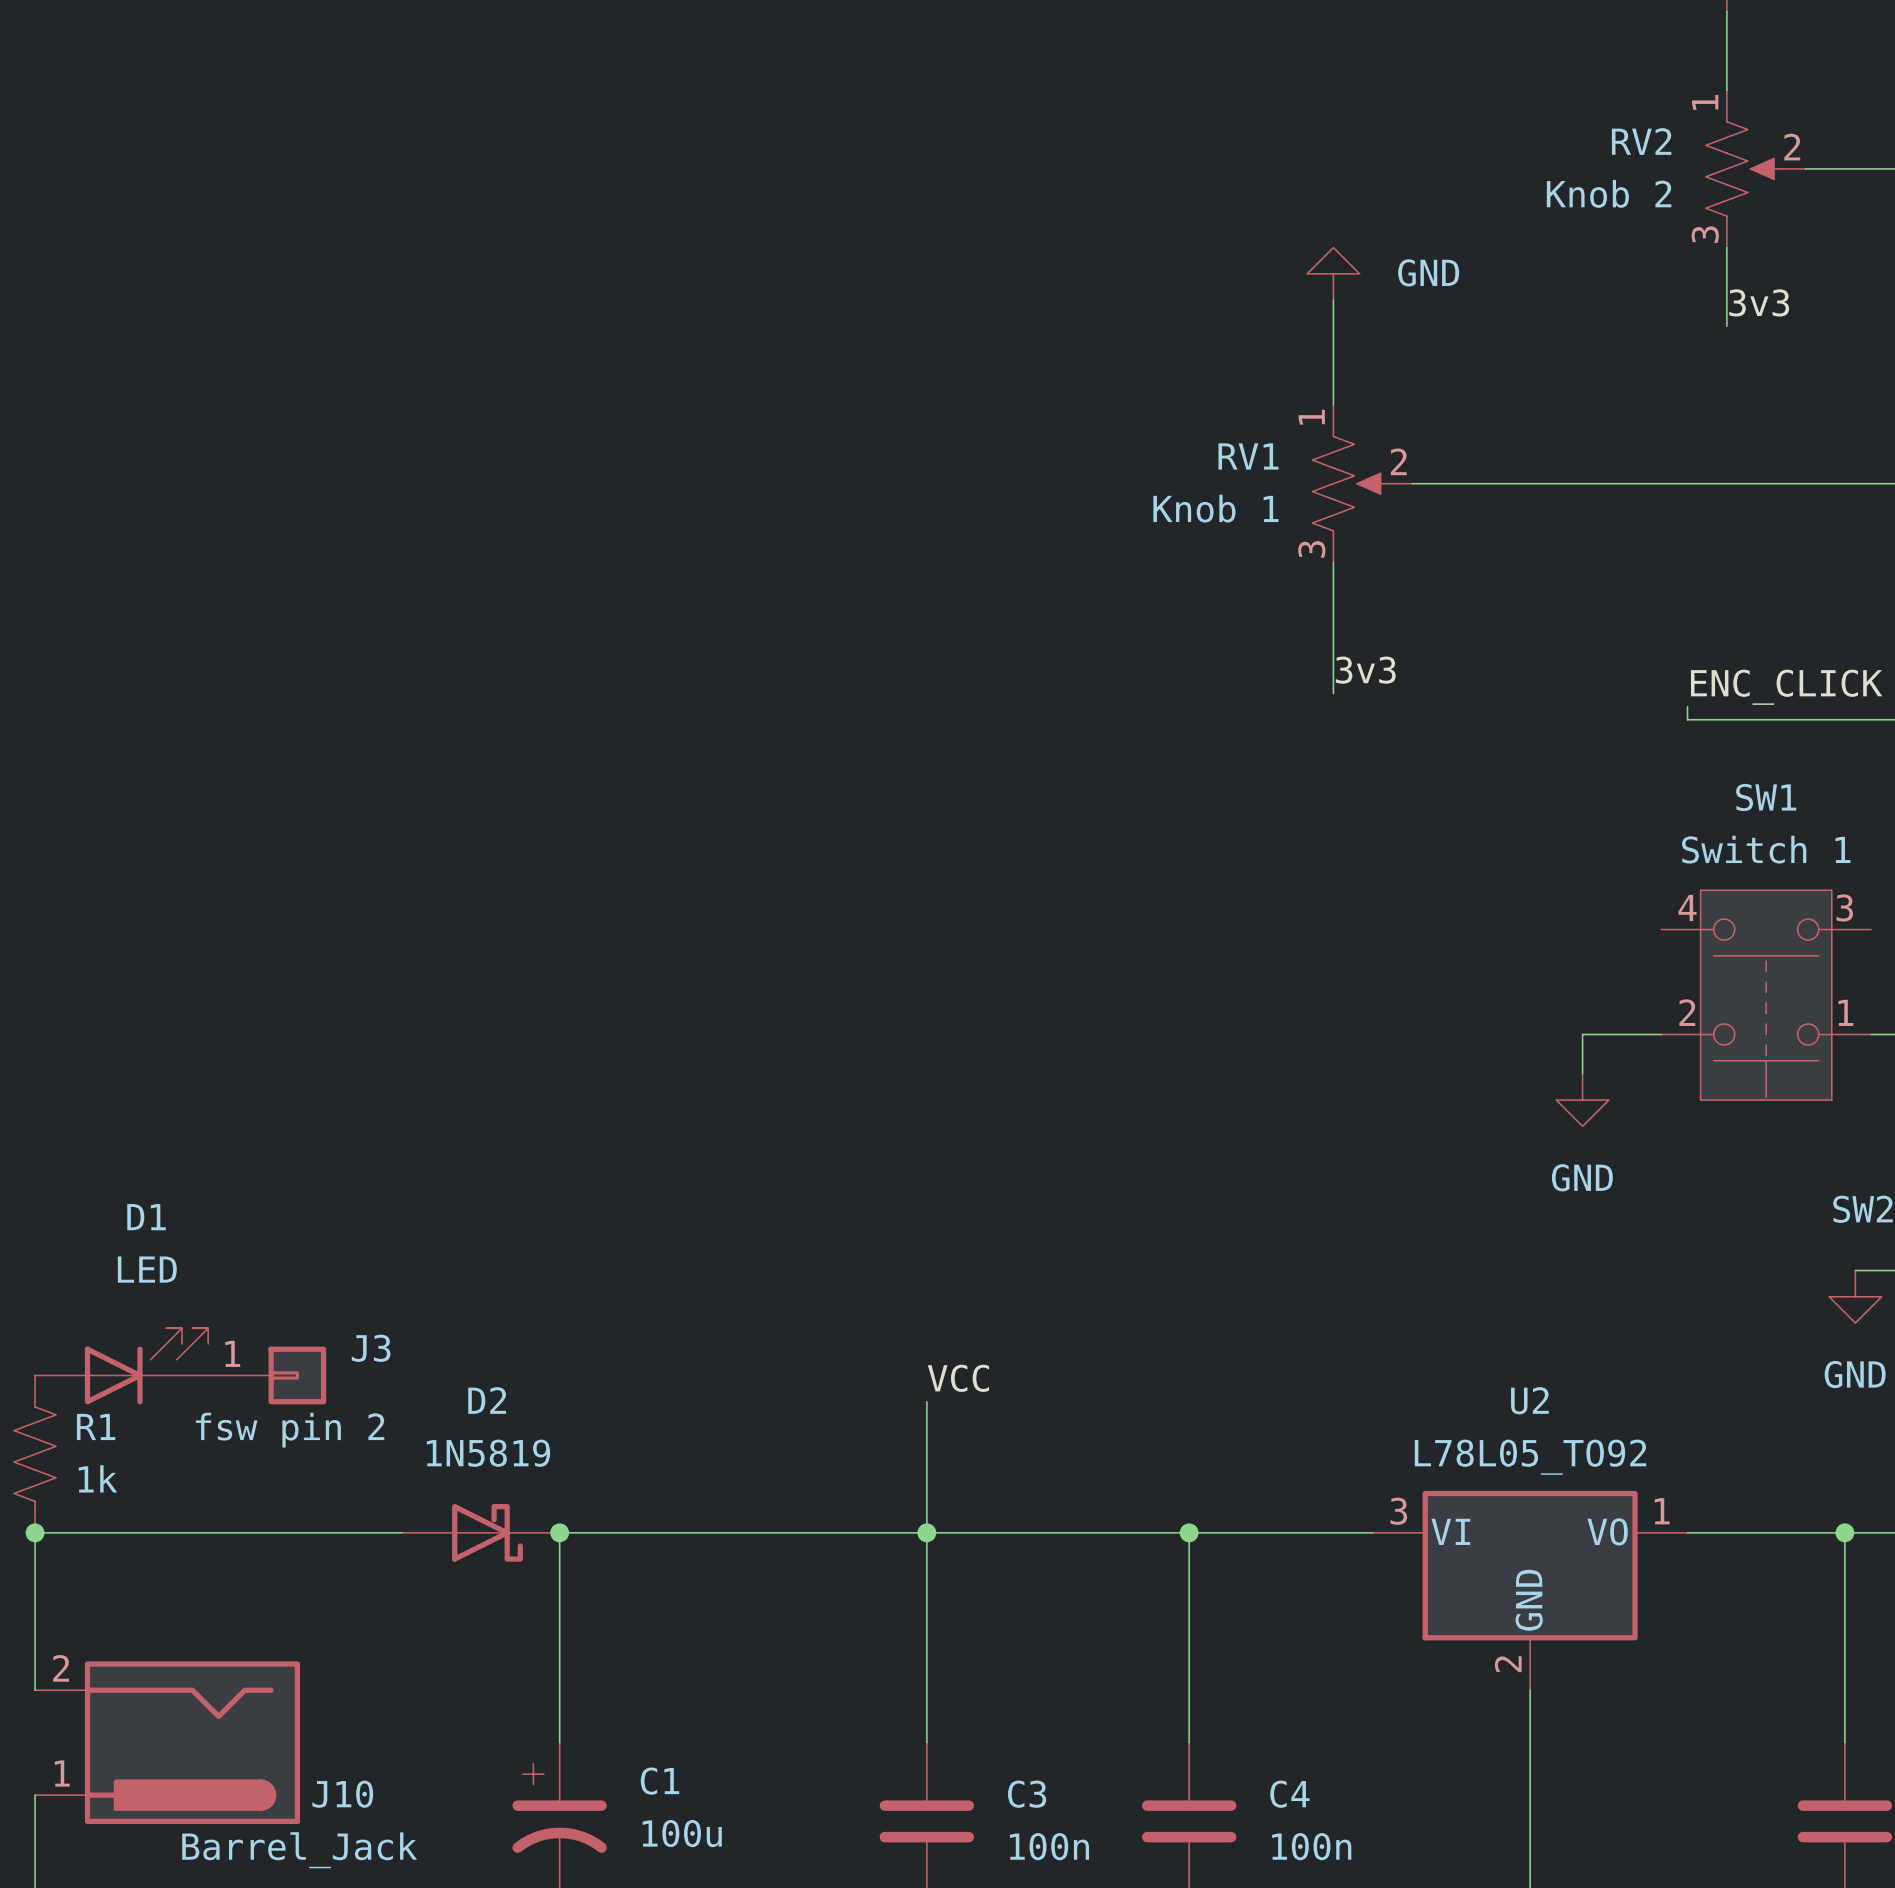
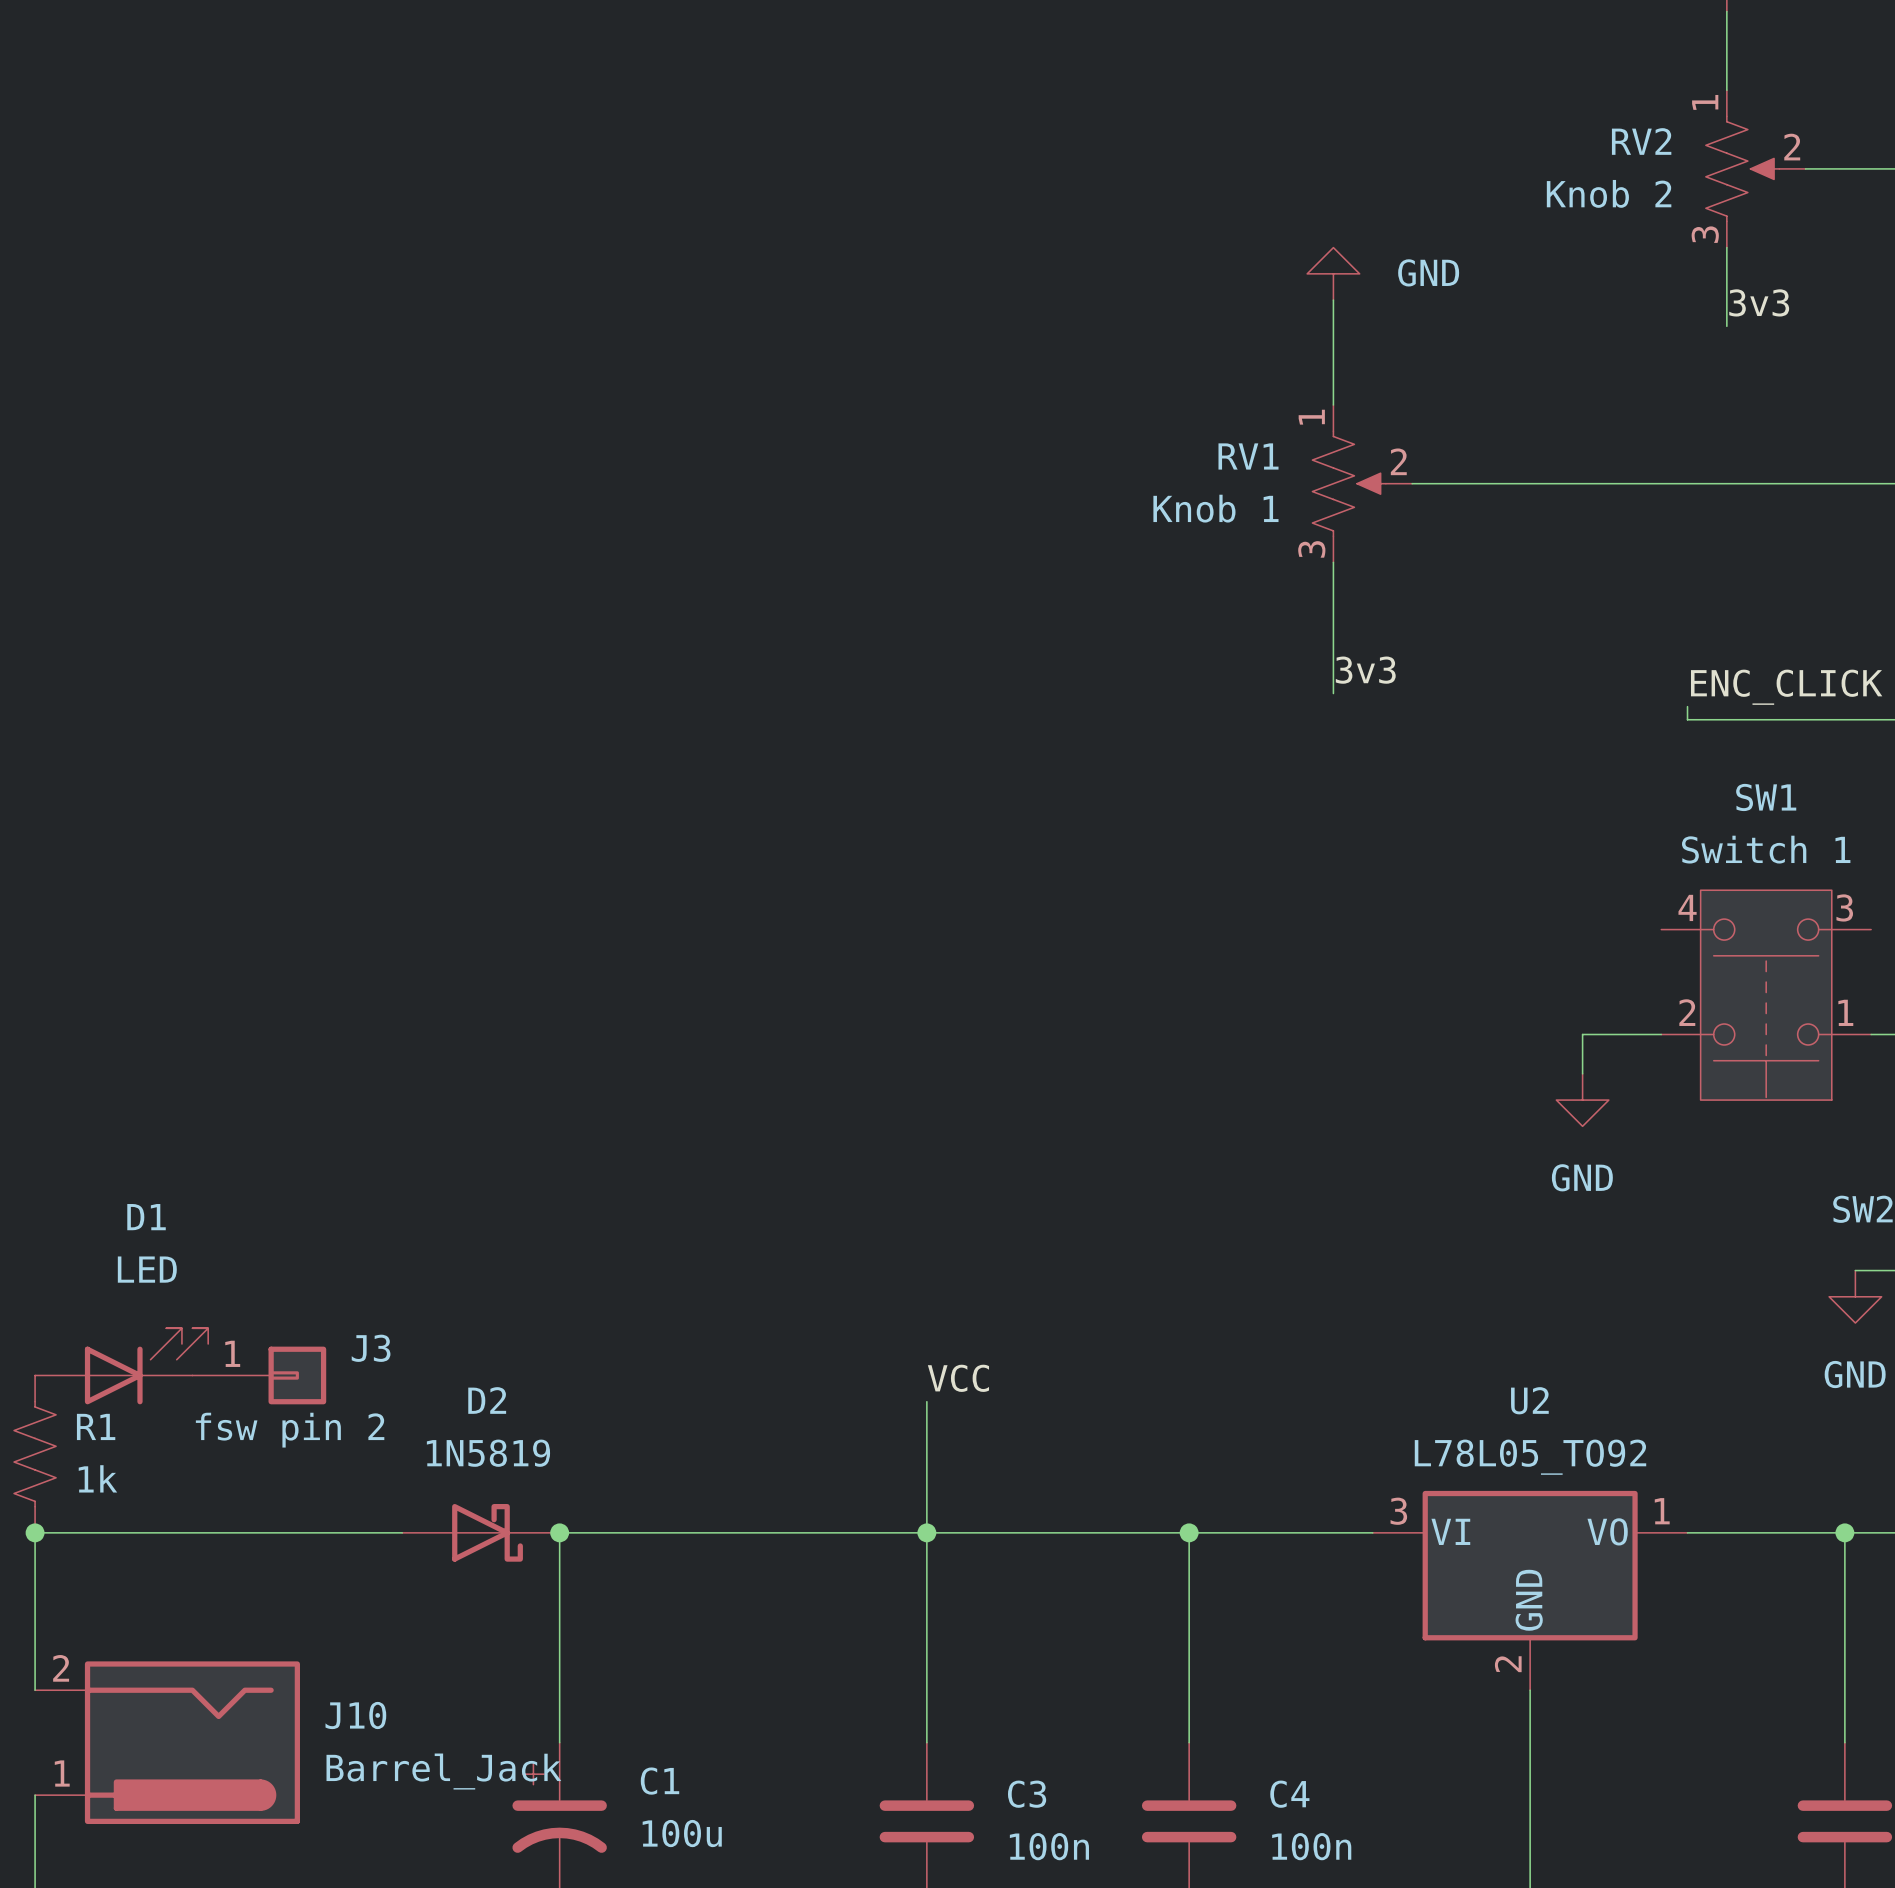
J10 name position: J10 (342, 1794) -> J10 (355, 1715)
J10 value position: Barrel_Jack (299, 1850) -> Barrel_Jack (443, 1771)

